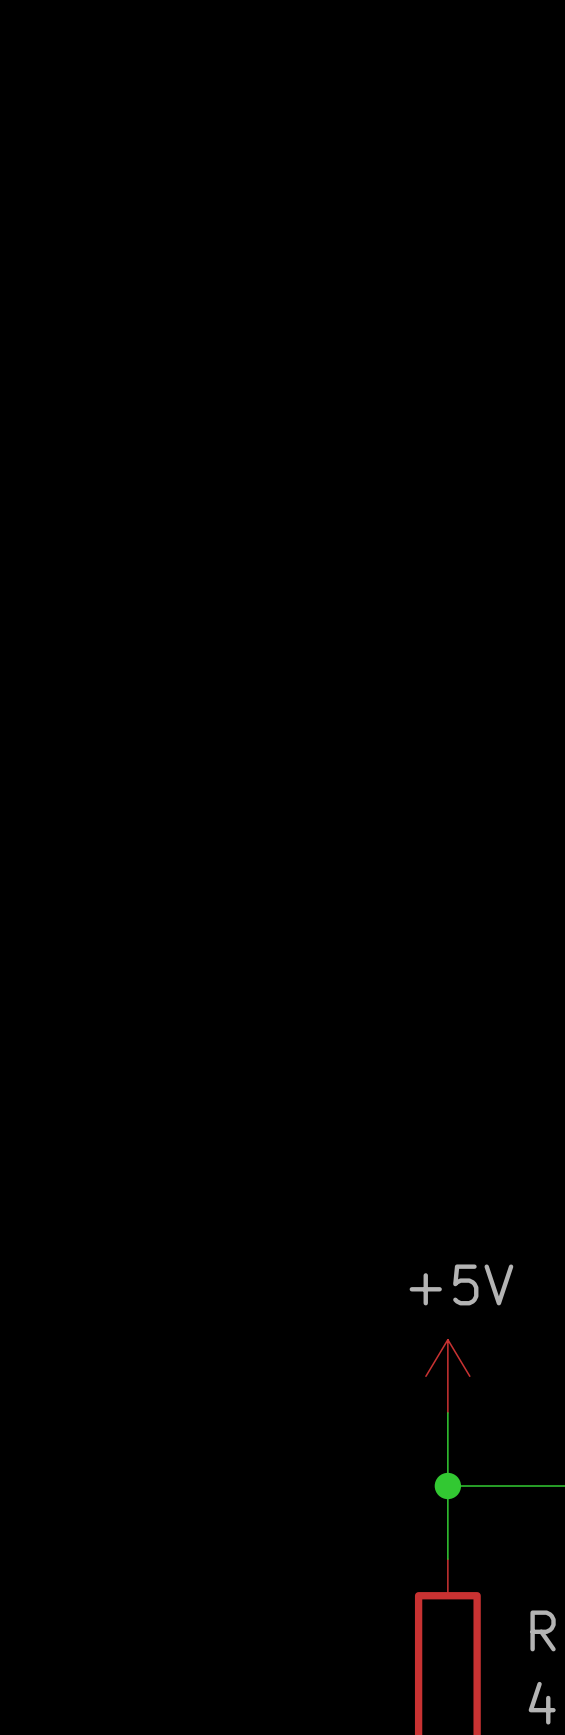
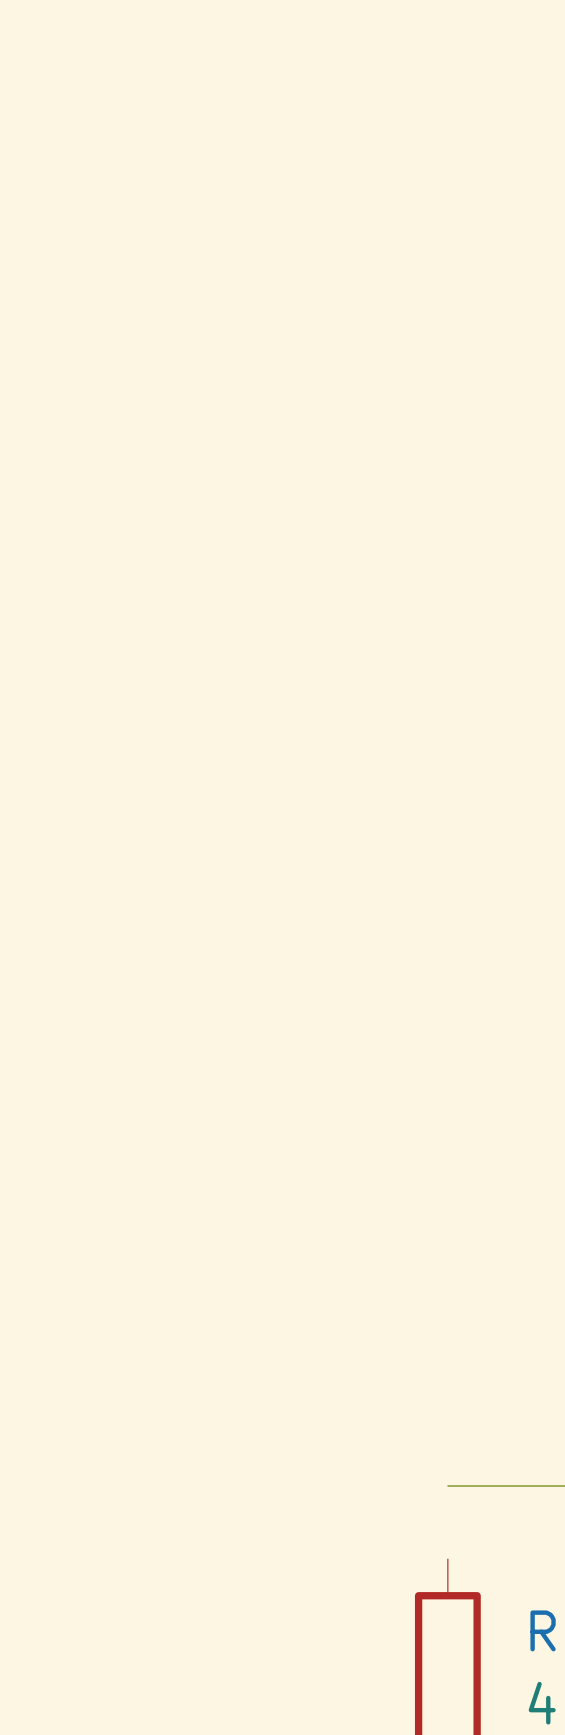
power symbol: +5V (447, 1376) -> none
wire: (447, 1412) (447, 1559) -> none
junction: (447, 1486) -> none

